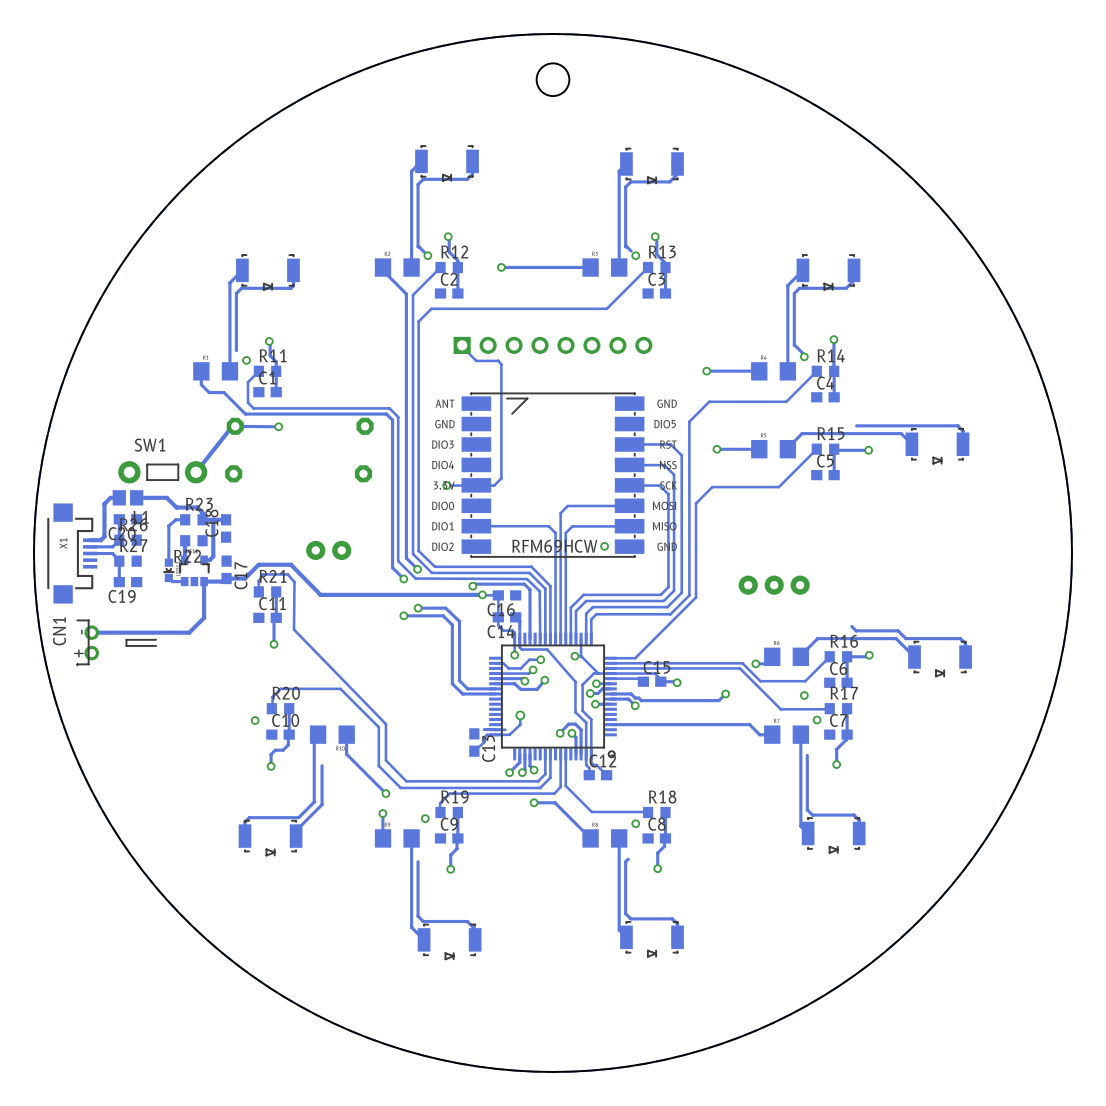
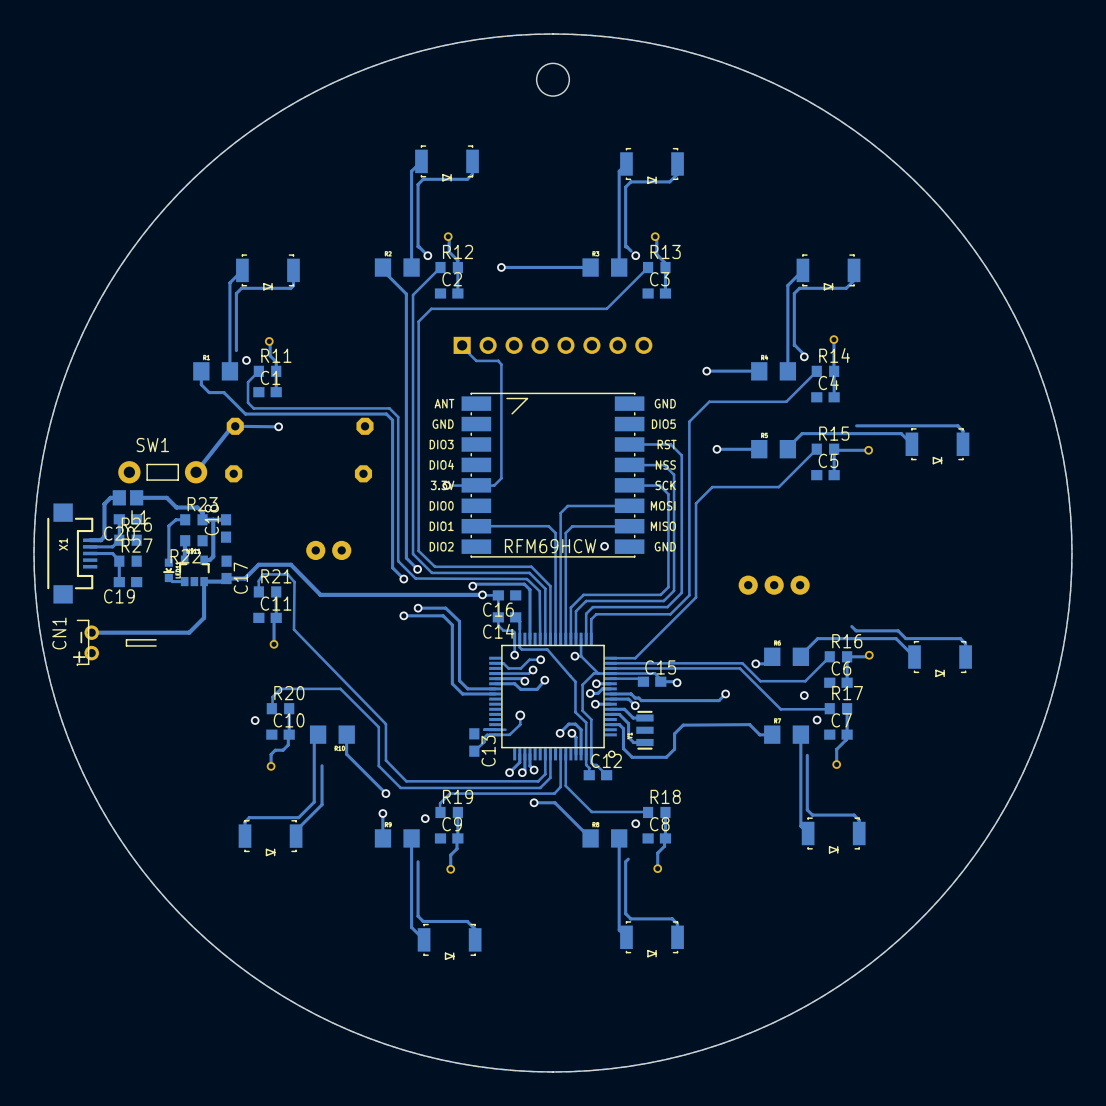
track: none -> (610, 709) (624, 709) (633, 717) (644, 717)
track: none -> (610, 714) (619, 714) (628, 723) (628, 737) (633, 742) (644, 742)
track: (749, 724) (619, 724) -> (749, 724) (683, 725) (674, 733) (674, 749) (666, 757) (632, 757) (623, 748) (623, 728) (619, 724)
part: none -> (644, 730)

